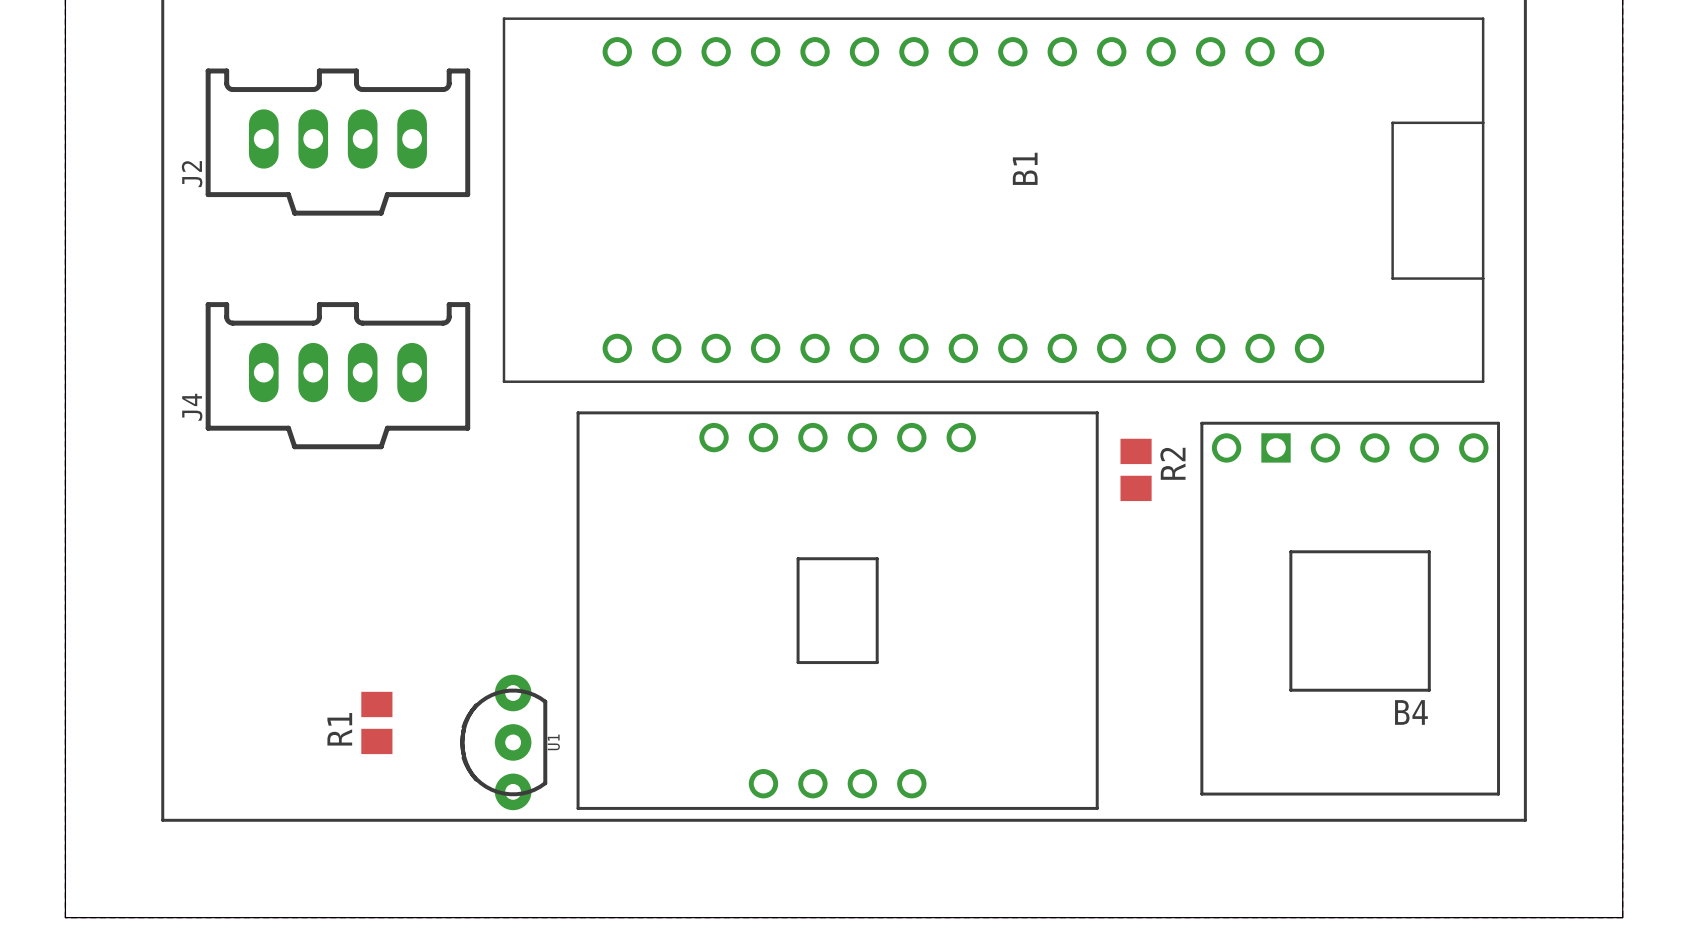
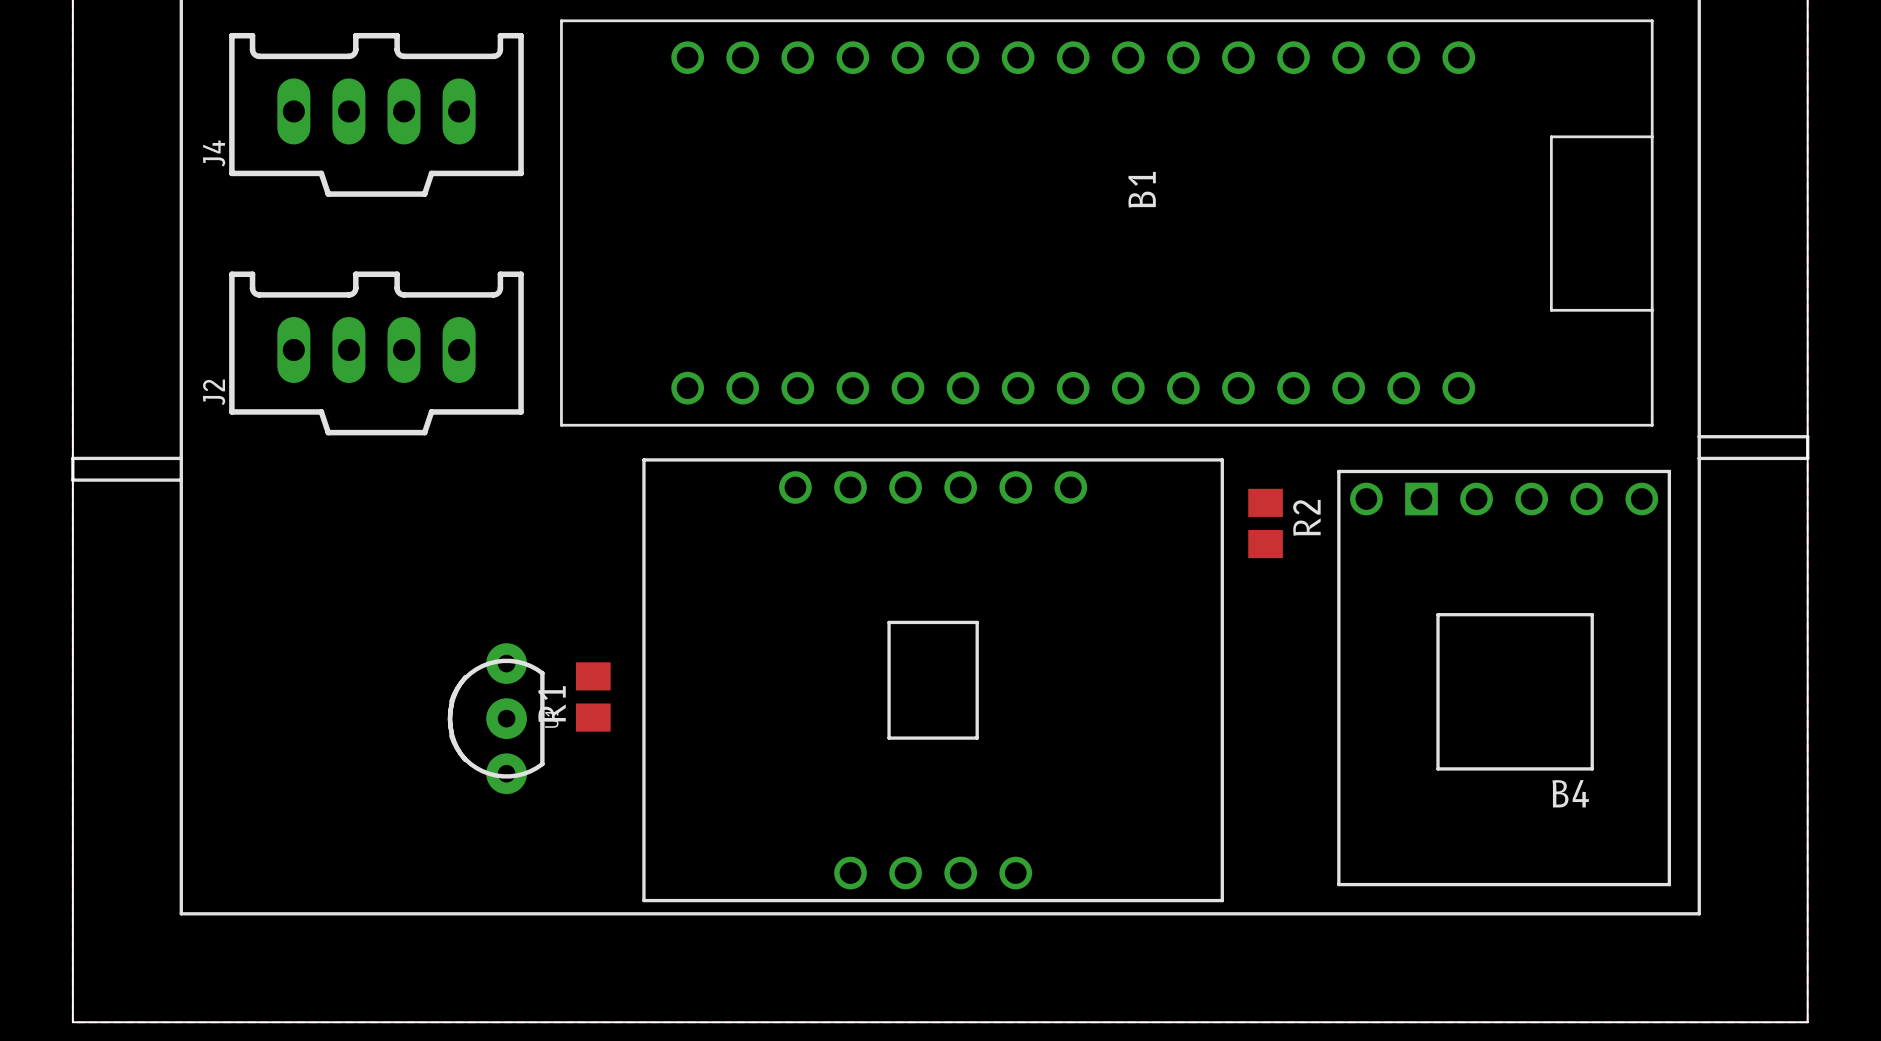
J2 position: (337, 142) -> (376, 353)
J4 position: (337, 375) -> (376, 114)
line: none -> (1699, 436) (1807, 436) (1807, 458) (1699, 458)
line: none -> (181, 458) (72, 458) (72, 480) (181, 480)
R1 position: (376, 722) -> (593, 696)
U1 position: (503, 742) -> (496, 718)

